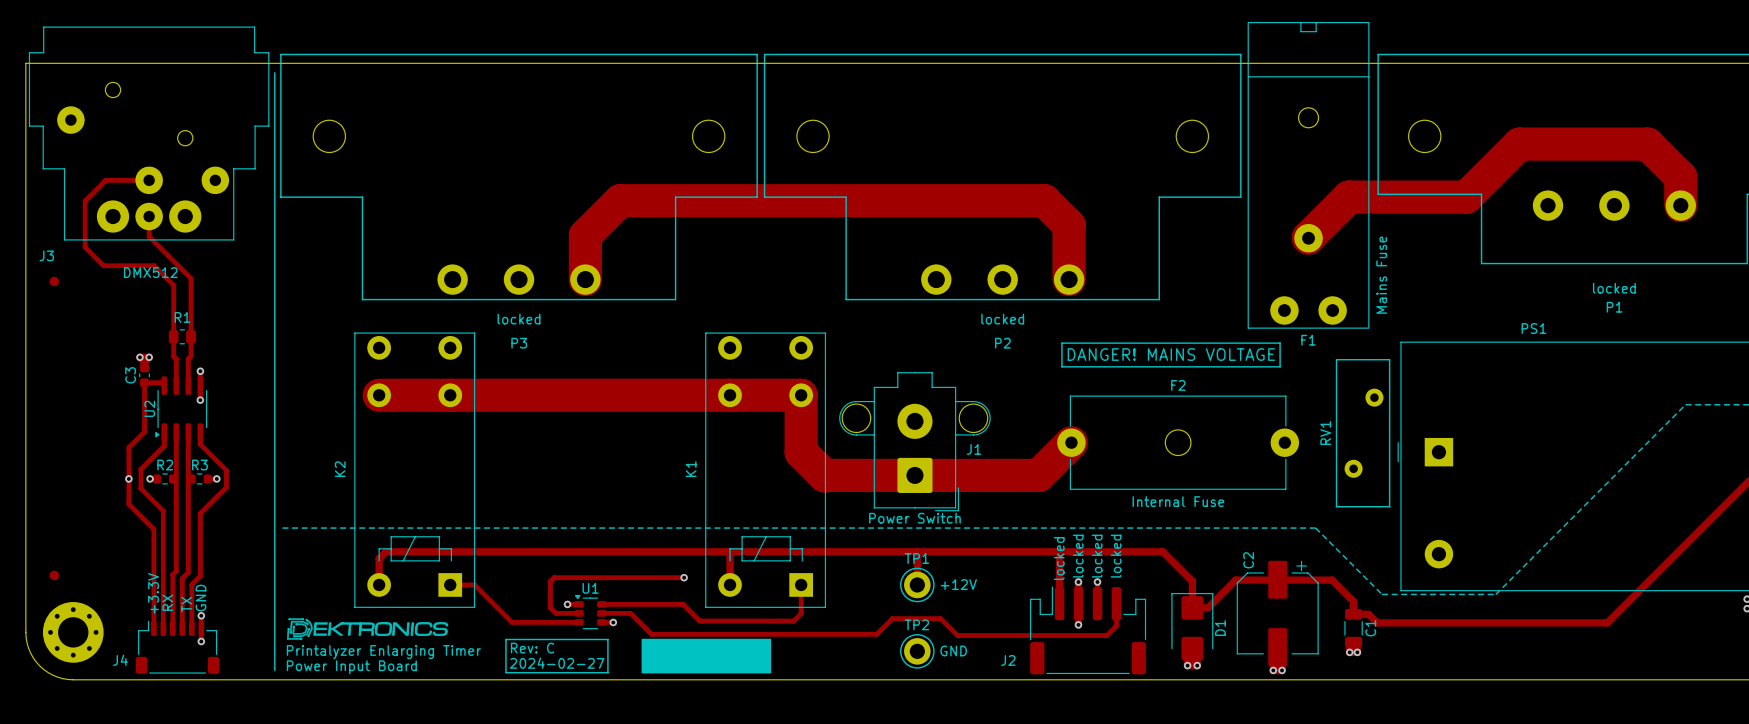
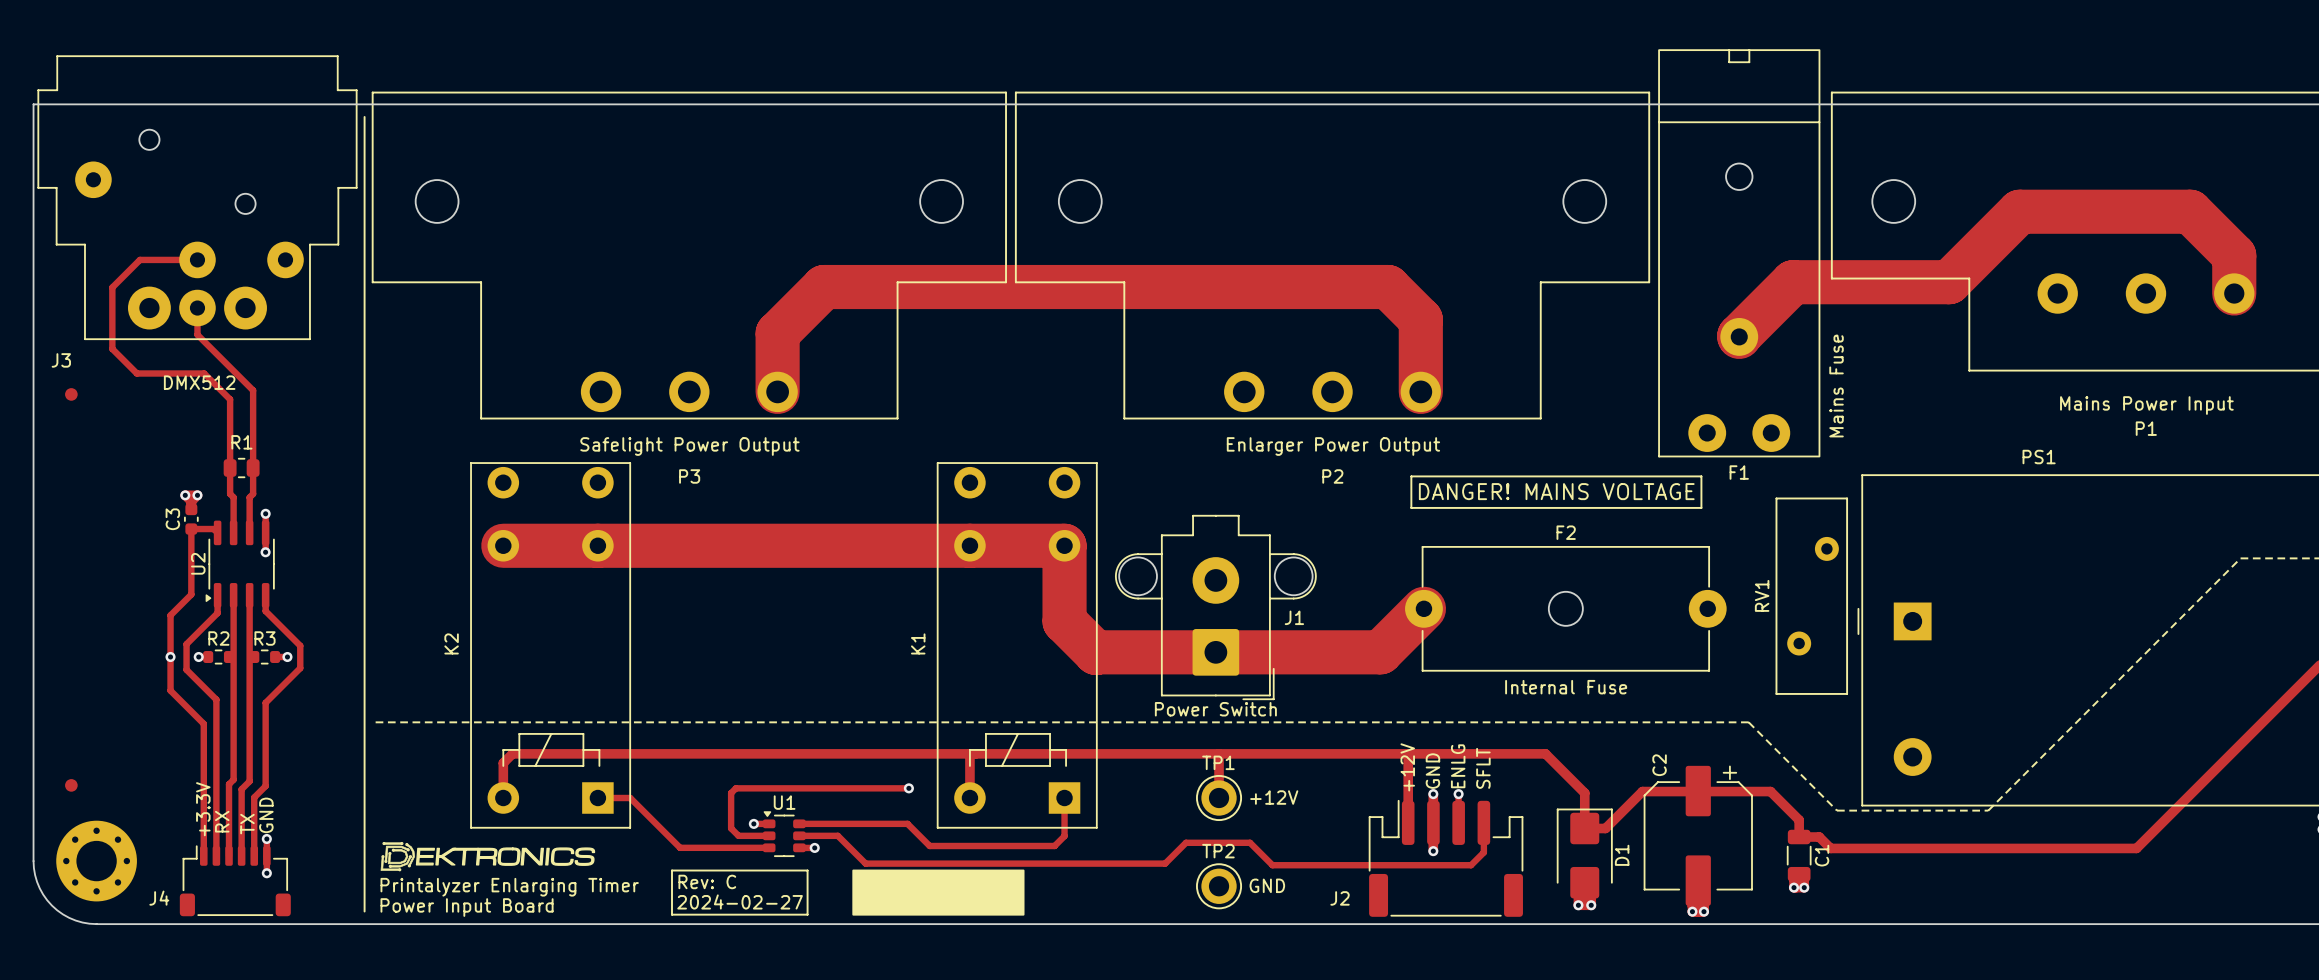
text: locked (1614, 288) -> Mains Power Input (2146, 405)
text: locked (519, 319) -> Safelight Power Output (689, 446)
text: locked (1002, 319) -> Enlarger Power Output (1333, 446)
text: locked (1078, 556) -> GND (1432, 771)
text: locked (1097, 556) -> ENLG (1458, 766)
text: locked (1116, 556) -> SFLT (1483, 768)
text: locked (1059, 558) -> +12V (1407, 767)

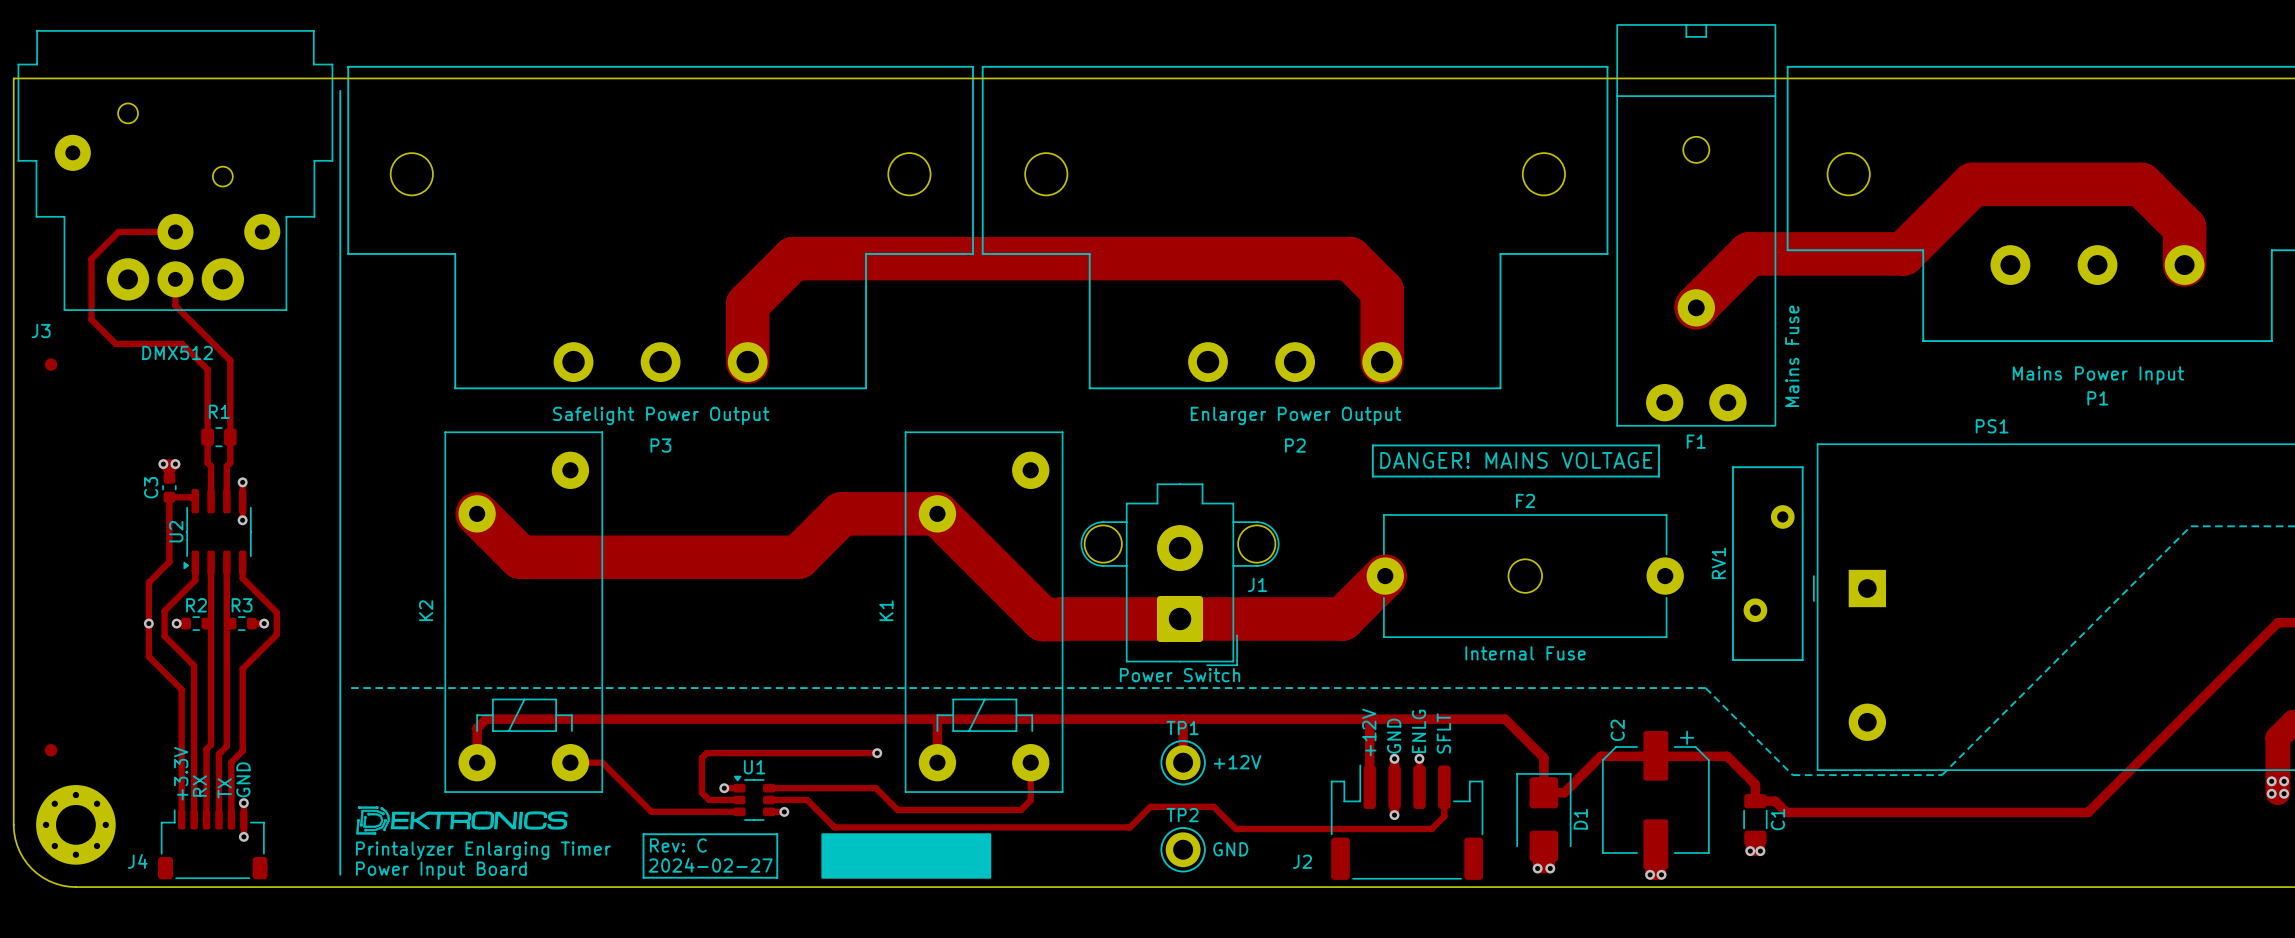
K2 footprint: [470, 462, 631, 829] -> [444, 431, 604, 793]
K1 footprint: [936, 462, 1098, 829] -> [904, 431, 1064, 793]
track: (503, 545) (872, 545) -> (477, 513) (520, 557) (798, 557) (841, 513)
track: (969, 545) (1064, 545) (1064, 621) (1096, 652) -> (937, 513) (1043, 619) (1061, 619)

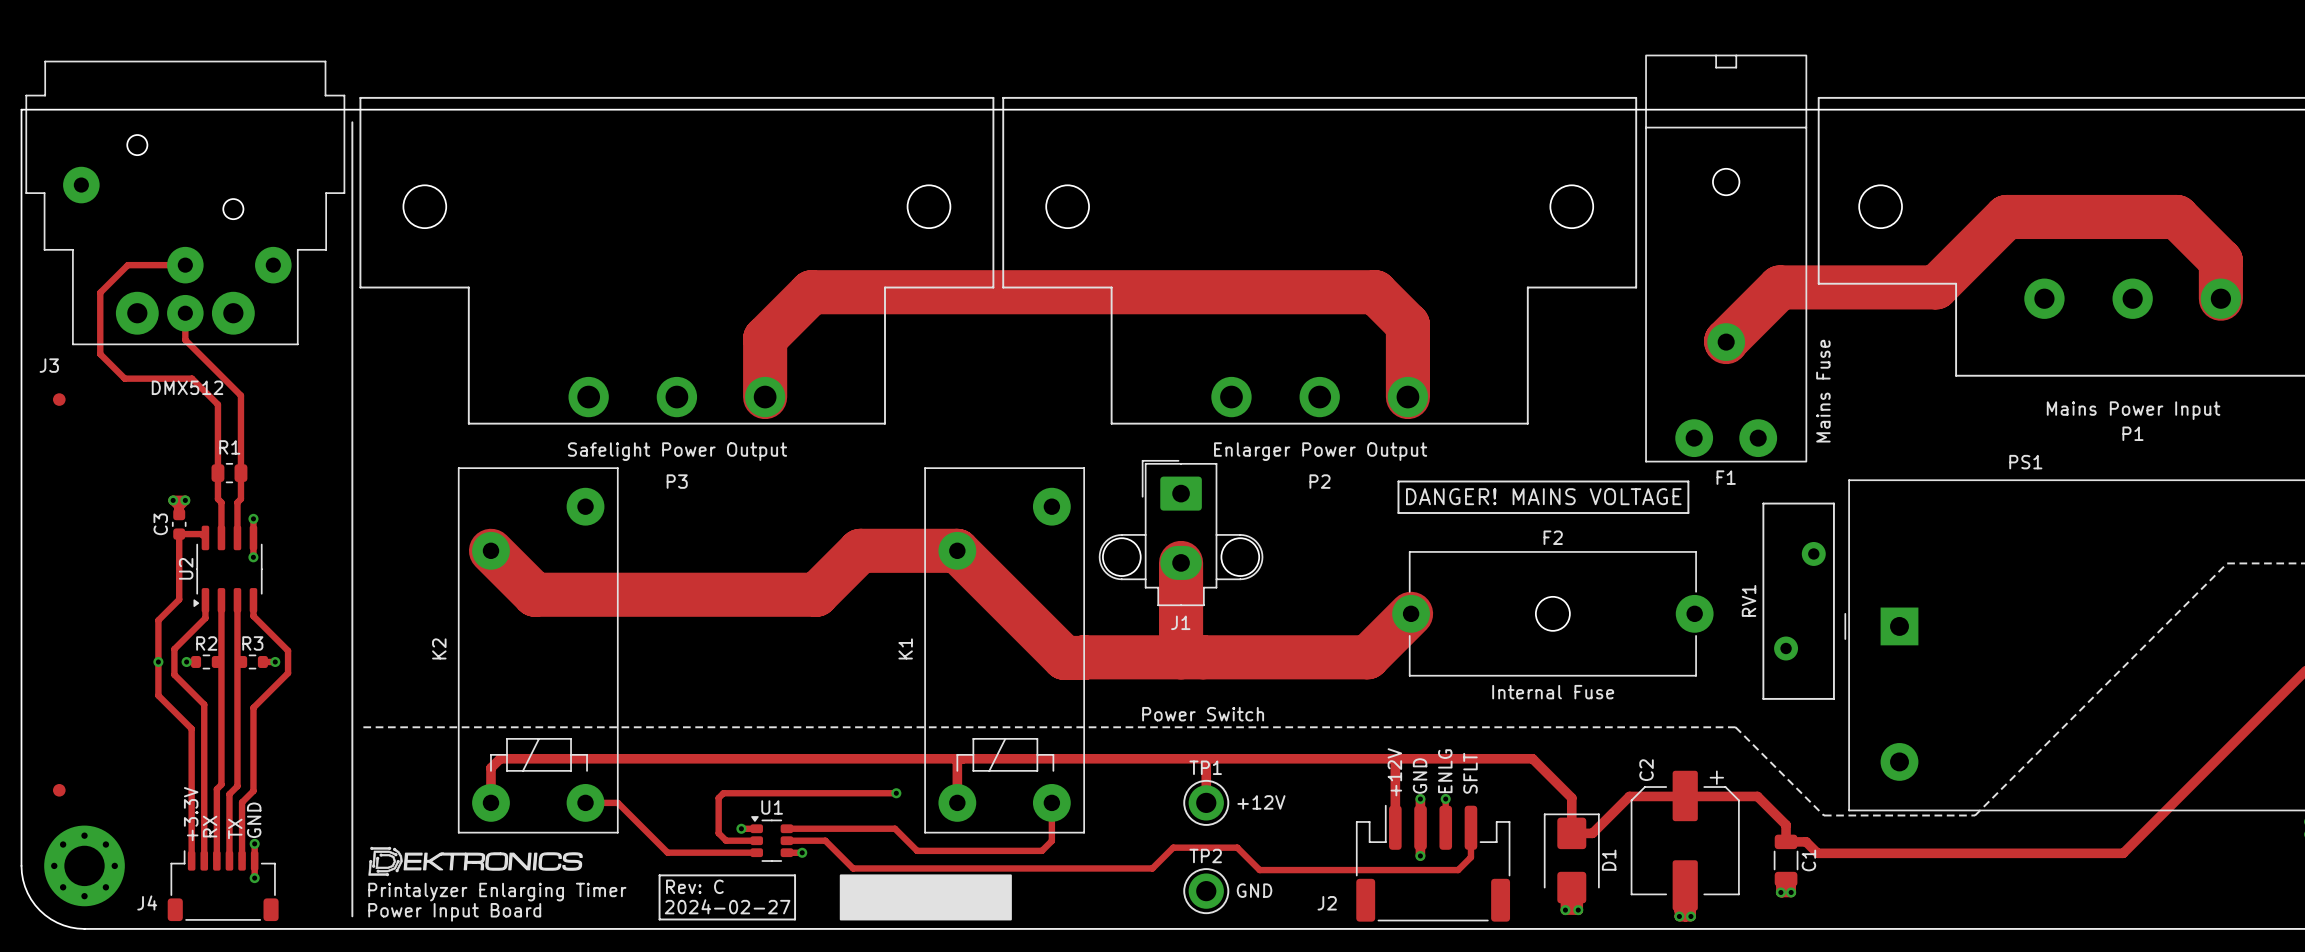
J1 footprint: [1080, 483, 1280, 667] -> [1098, 460, 1264, 607]
track: none -> (1181, 562) (1181, 657)
J1 name position: J1 (1257, 584) -> J1 (1180, 622)

